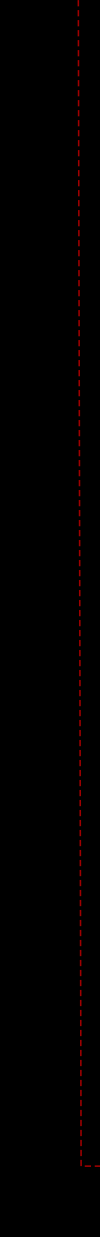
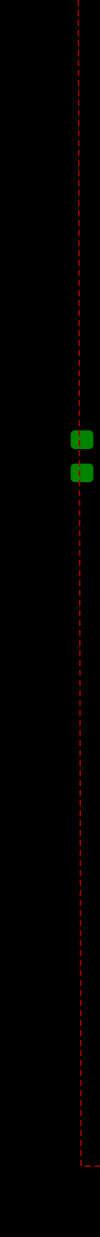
part: none -> (82, 456)

